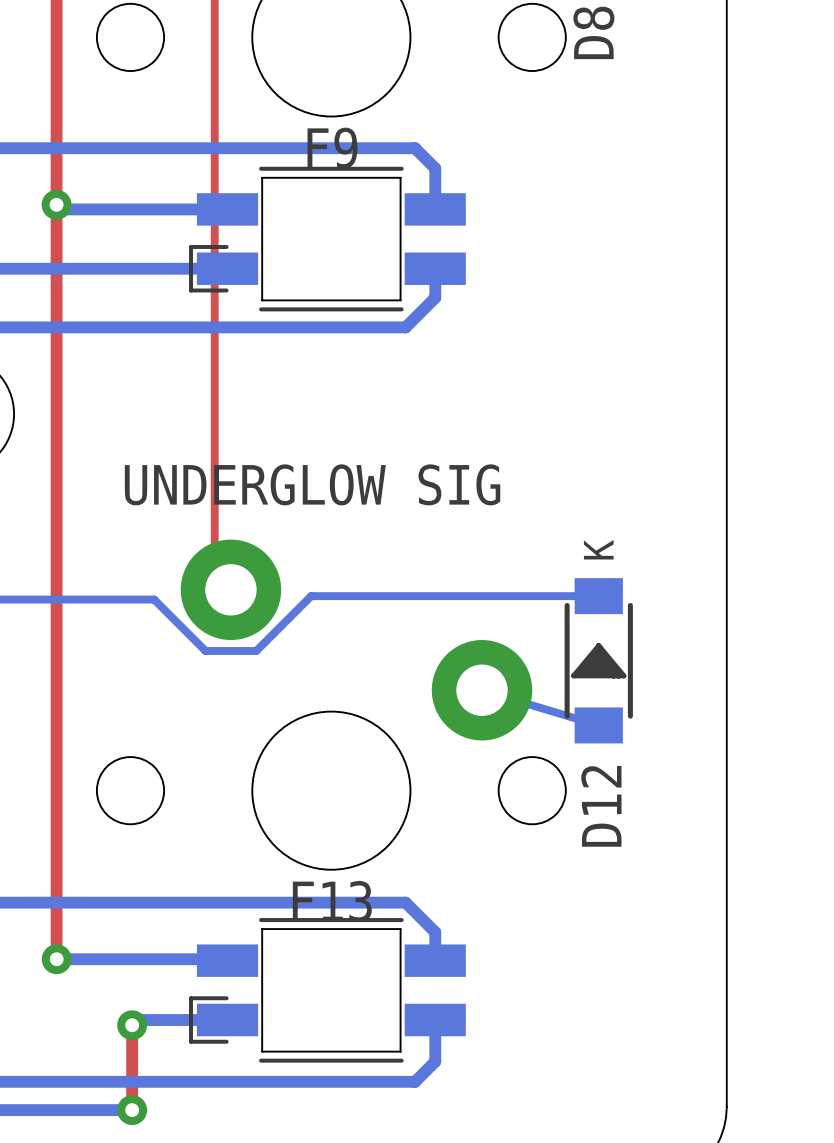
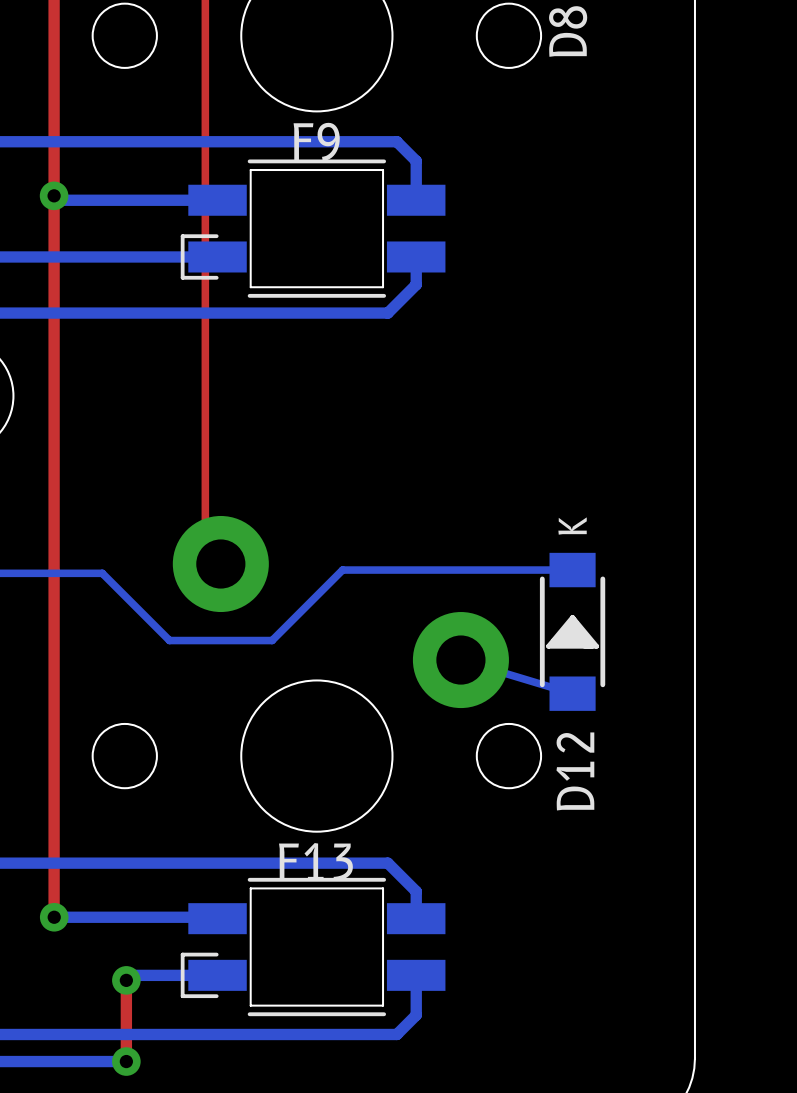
text: UNDERGLOW SIG (312, 484) -> none
bottom track: (358, 596) (311, 596) (256, 650) (205, 650) (154, 599) (107, 599) -> (342, 570) (272, 640) (169, 640) (102, 573)

